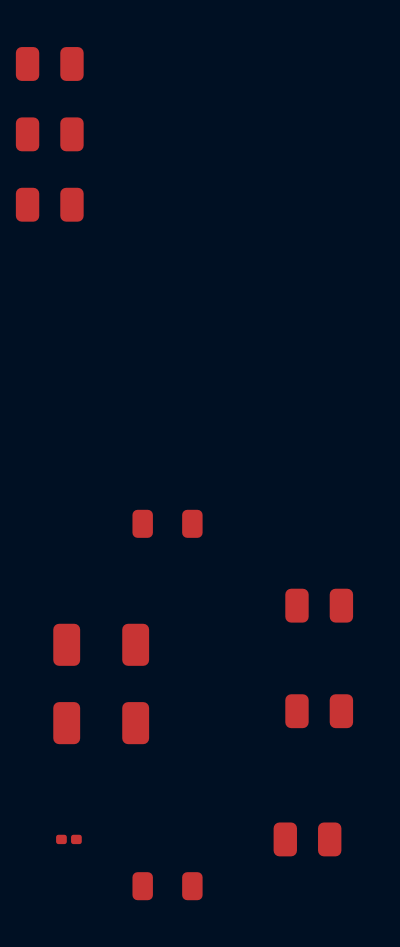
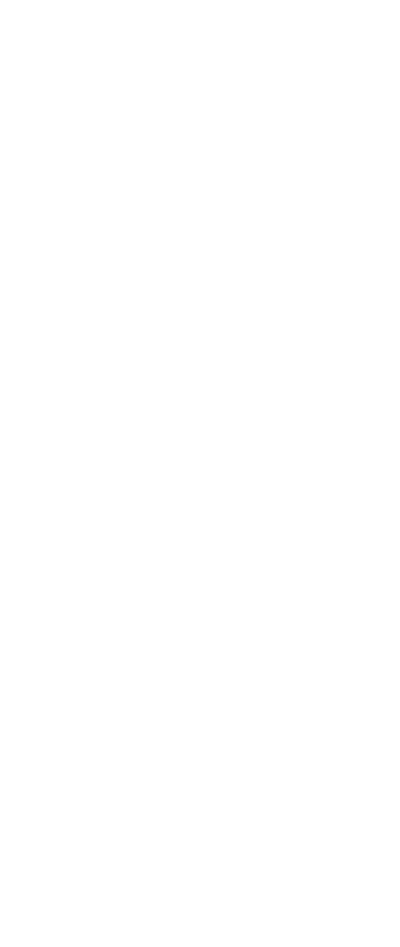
part: (49, 63) -> none
part: (49, 134) -> none
part: (49, 204) -> none
part: (167, 523) -> none
part: (319, 605) -> none
part: (101, 644) -> none
part: (319, 711) -> none
part: (101, 723) -> none
part: (68, 839) -> none
part: (307, 839) -> none
part: (167, 886) -> none

